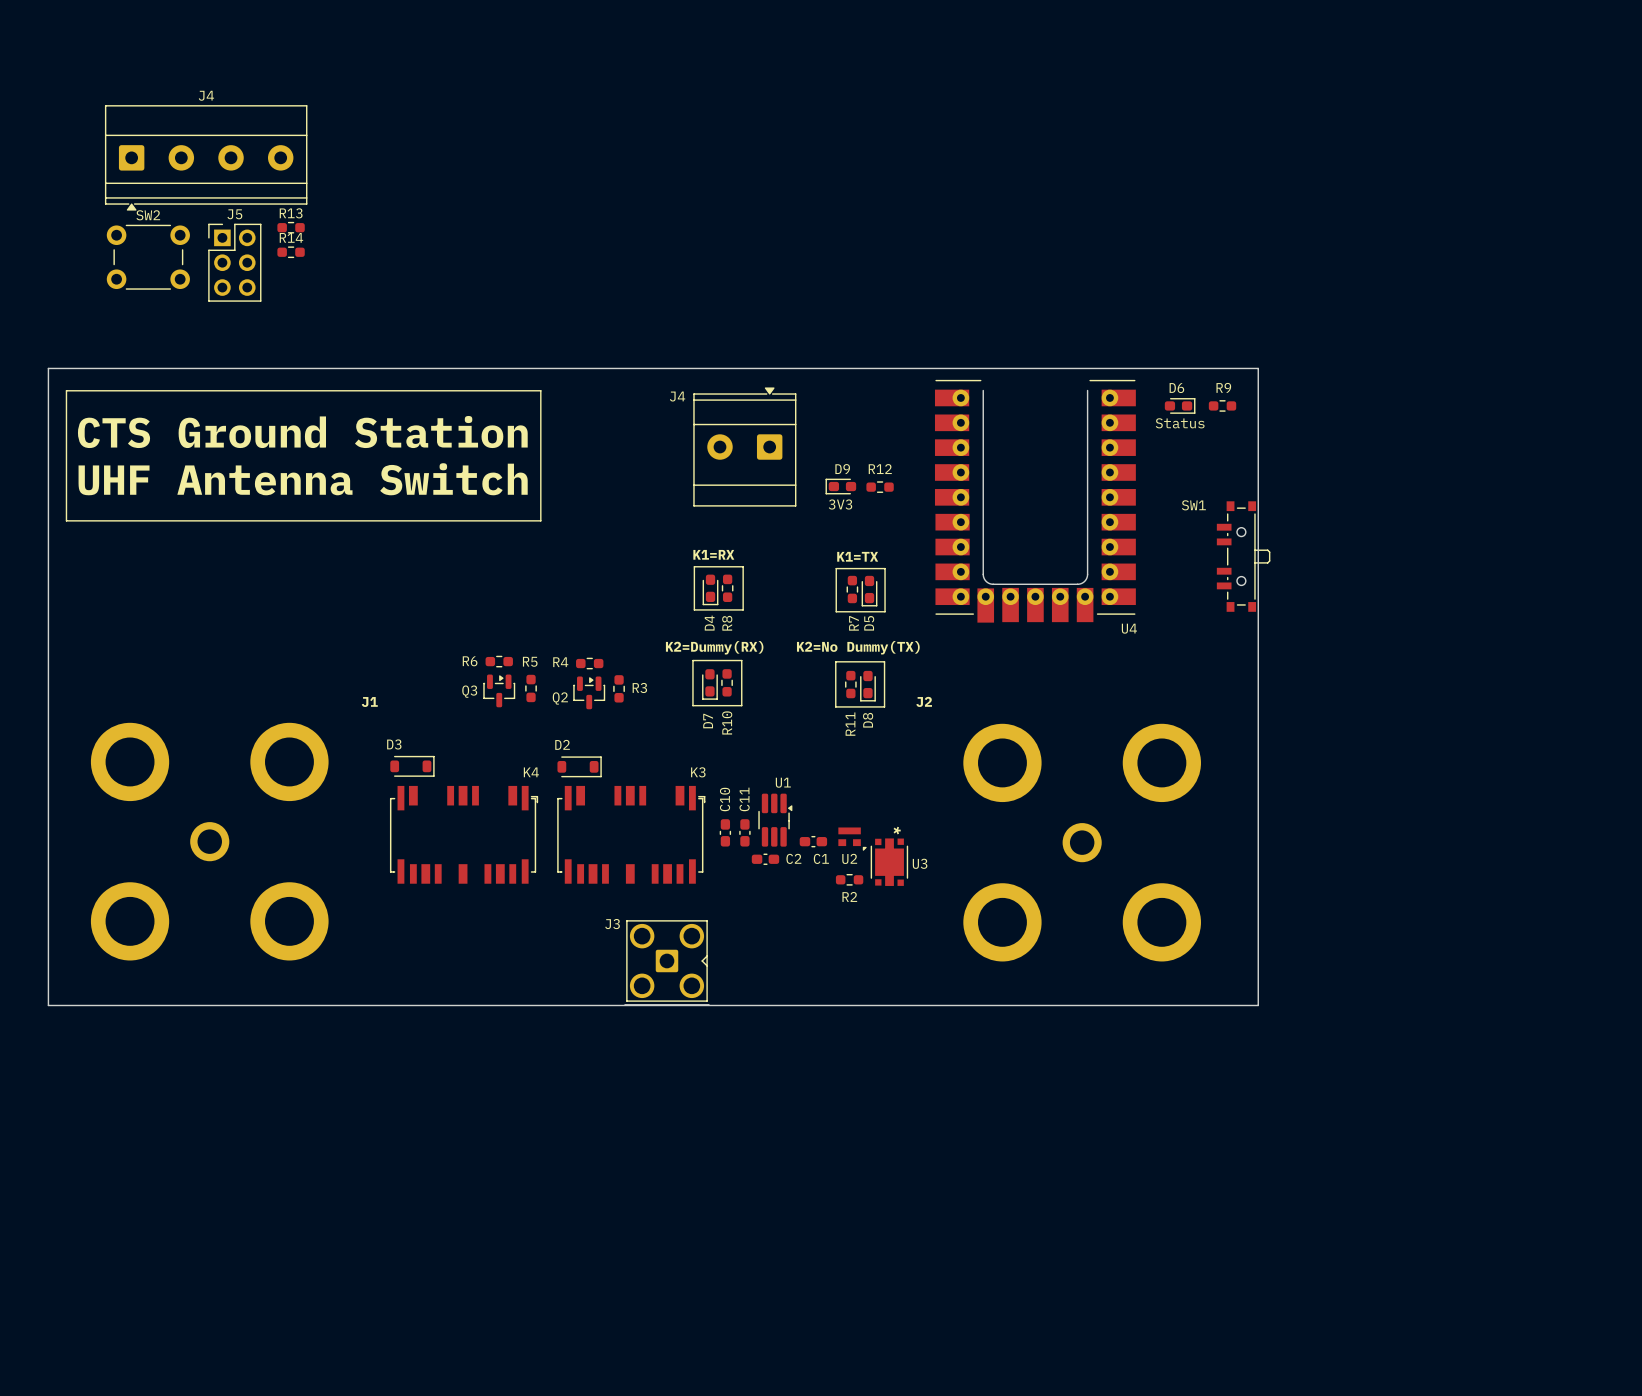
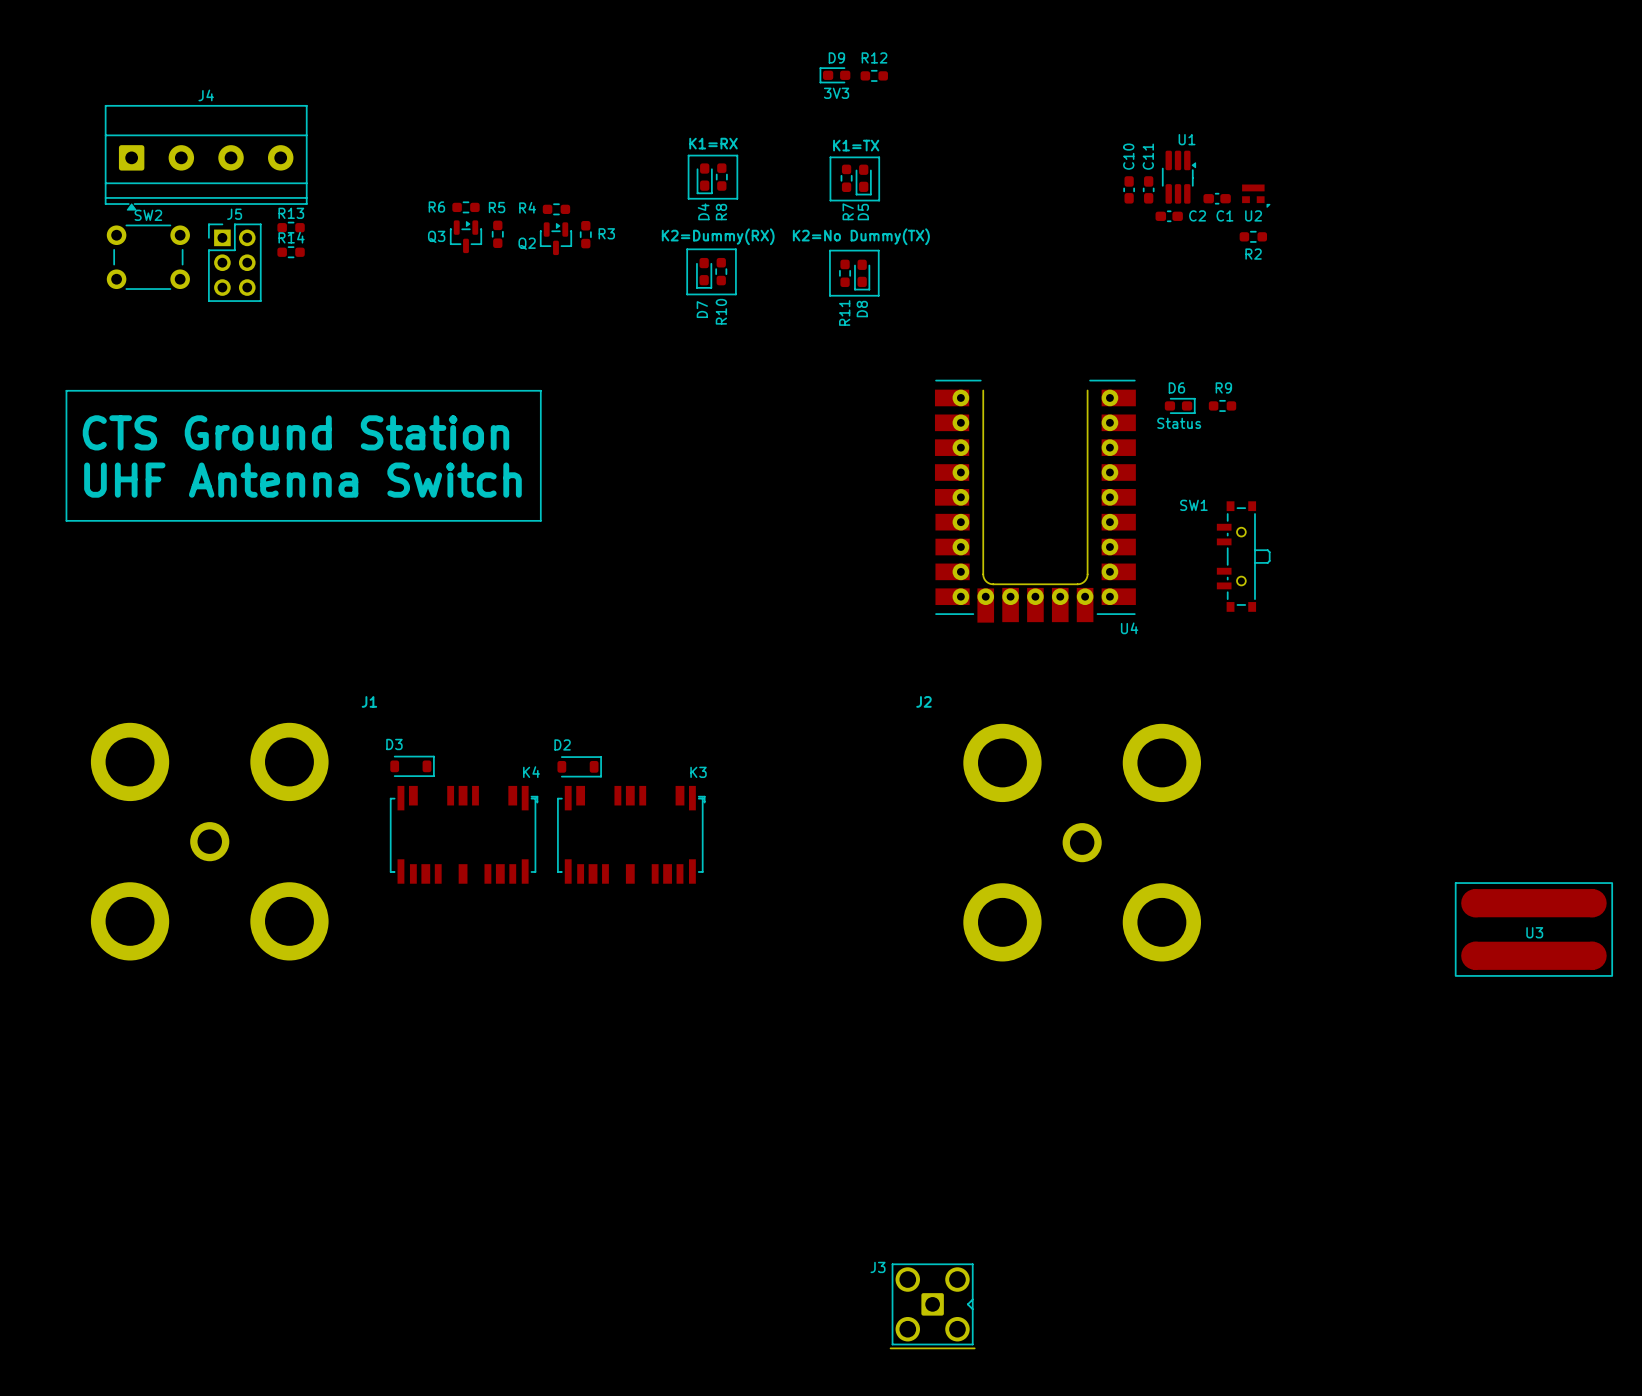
text: none -> 3V3 (836, 93)
text: none -> K1=RX (713, 143)
text: none -> K1=TX (856, 145)
line: none -> (688, 155) (737, 155) (737, 198) (688, 198) (688, 155)
line: none -> (830, 157) (879, 157) (879, 200) (830, 200) (830, 157)
text: none -> K2=Dummy(RX) (718, 236)
text: none -> K2=No Dummy(TX) (861, 236)
line: none -> (687, 249) (735, 249) (735, 294) (687, 294) (687, 249)
line: none -> (829, 250) (878, 250) (878, 295) (829, 295) (829, 250)
board edge: (48, 368) (1258, 368) (1258, 1005) (48, 1005) (48, 368) -> none
J4: (744, 446) -> none
D9 position: (840, 486) -> (835, 75)
R12 position: (880, 487) -> (874, 75)
text: 3V3 (840, 504) -> none
text: K1=RX (713, 554) -> none
text: K1=TX (857, 556) -> none
line: (694, 566) (743, 566) (743, 609) (694, 609) (694, 566) -> none
line: (836, 568) (885, 568) (885, 611) (836, 611) (836, 568) -> none
R8 position: (727, 588) -> (721, 177)
D4 position: (710, 589) -> (704, 178)
R7 position: (852, 589) -> (846, 178)
D5 position: (869, 591) -> (863, 179)
text: K2=Dummy(RX) (714, 647) -> none
text: K2=No Dummy(TX) (858, 647) -> none
line: (692, 660) (741, 660) (741, 705) (692, 705) (692, 660) -> none
R6 position: (499, 661) -> (466, 207)
line: (835, 661) (884, 661) (884, 706) (835, 706) (835, 661) -> none
R4 position: (589, 663) -> (556, 209)
R10 position: (727, 682) -> (721, 271)
D7 position: (709, 684) -> (704, 273)
R11 position: (850, 684) -> (845, 273)
D8 position: (867, 686) -> (862, 274)
R5 position: (531, 688) -> (497, 234)
R3 position: (619, 688) -> (585, 234)
Q3 position: (499, 690) -> (466, 236)
Q2 position: (589, 692) -> (555, 238)
U1 position: (775, 820) -> (1179, 177)
C10 position: (725, 832) -> (1129, 189)
C11 position: (744, 832) -> (1148, 189)
U3 footprint: [870, 838, 908, 886] -> [1455, 882, 1613, 977]
U2 position: (852, 839) -> (1256, 196)
C1 position: (813, 841) -> (1217, 198)
C2 position: (765, 859) -> (1169, 216)
U3 name position: U3 (920, 863) -> U3 (1534, 932)
R2 position: (849, 879) -> (1253, 236)
J3 position: (666, 962) -> (932, 1306)

